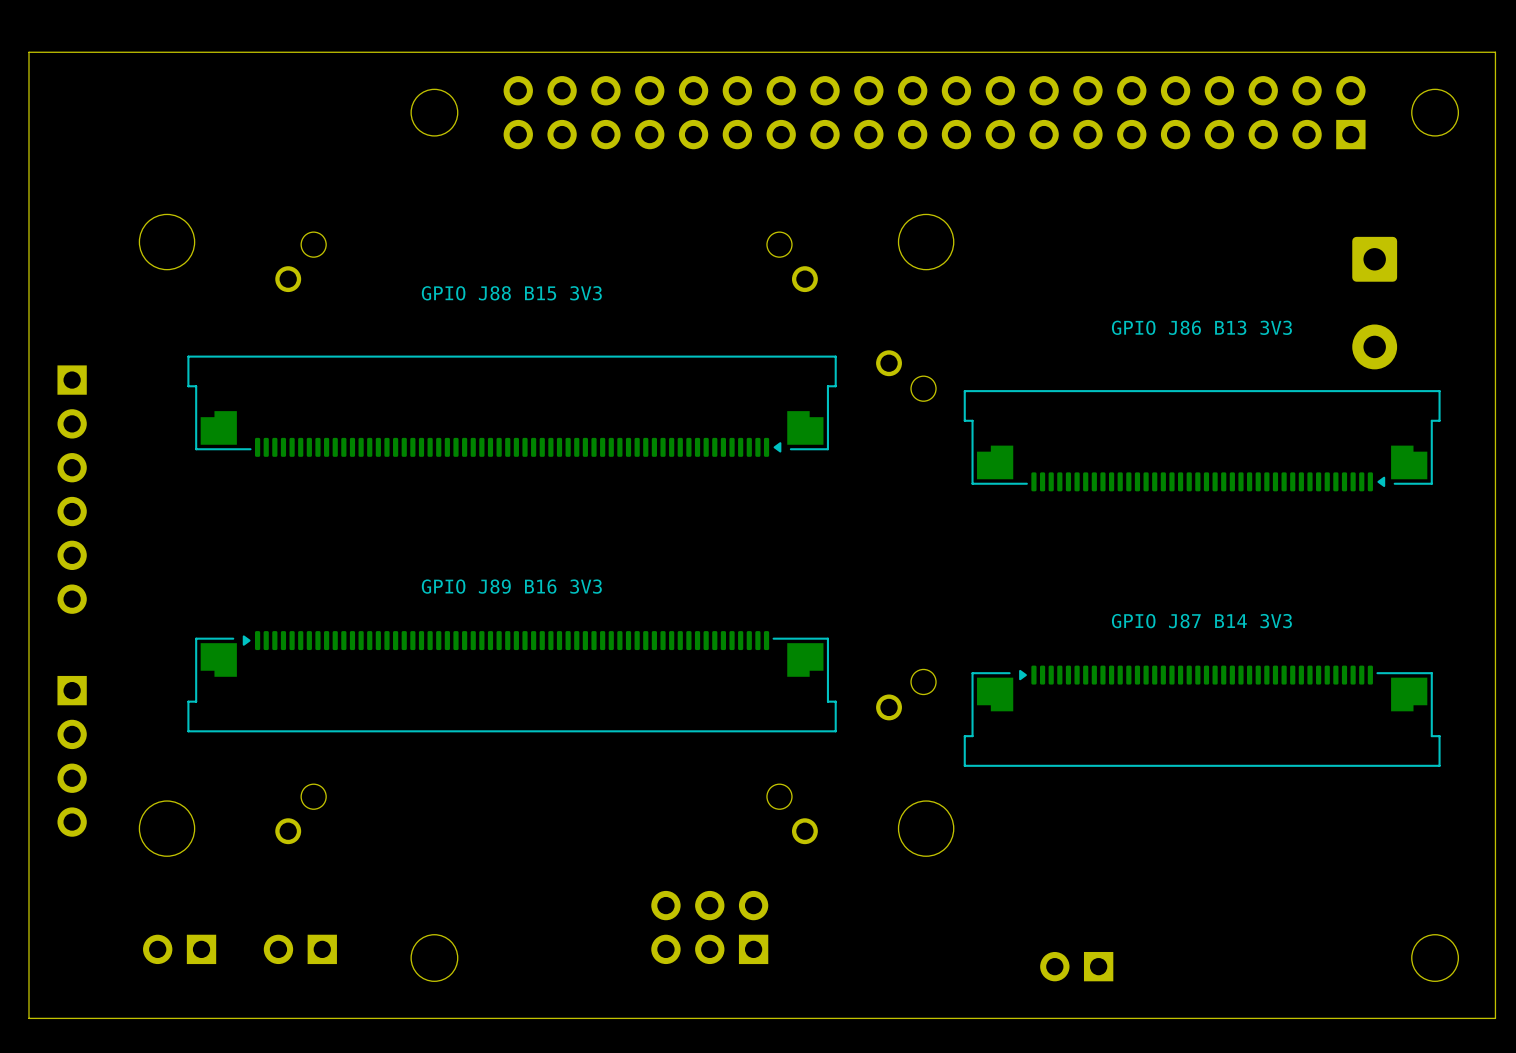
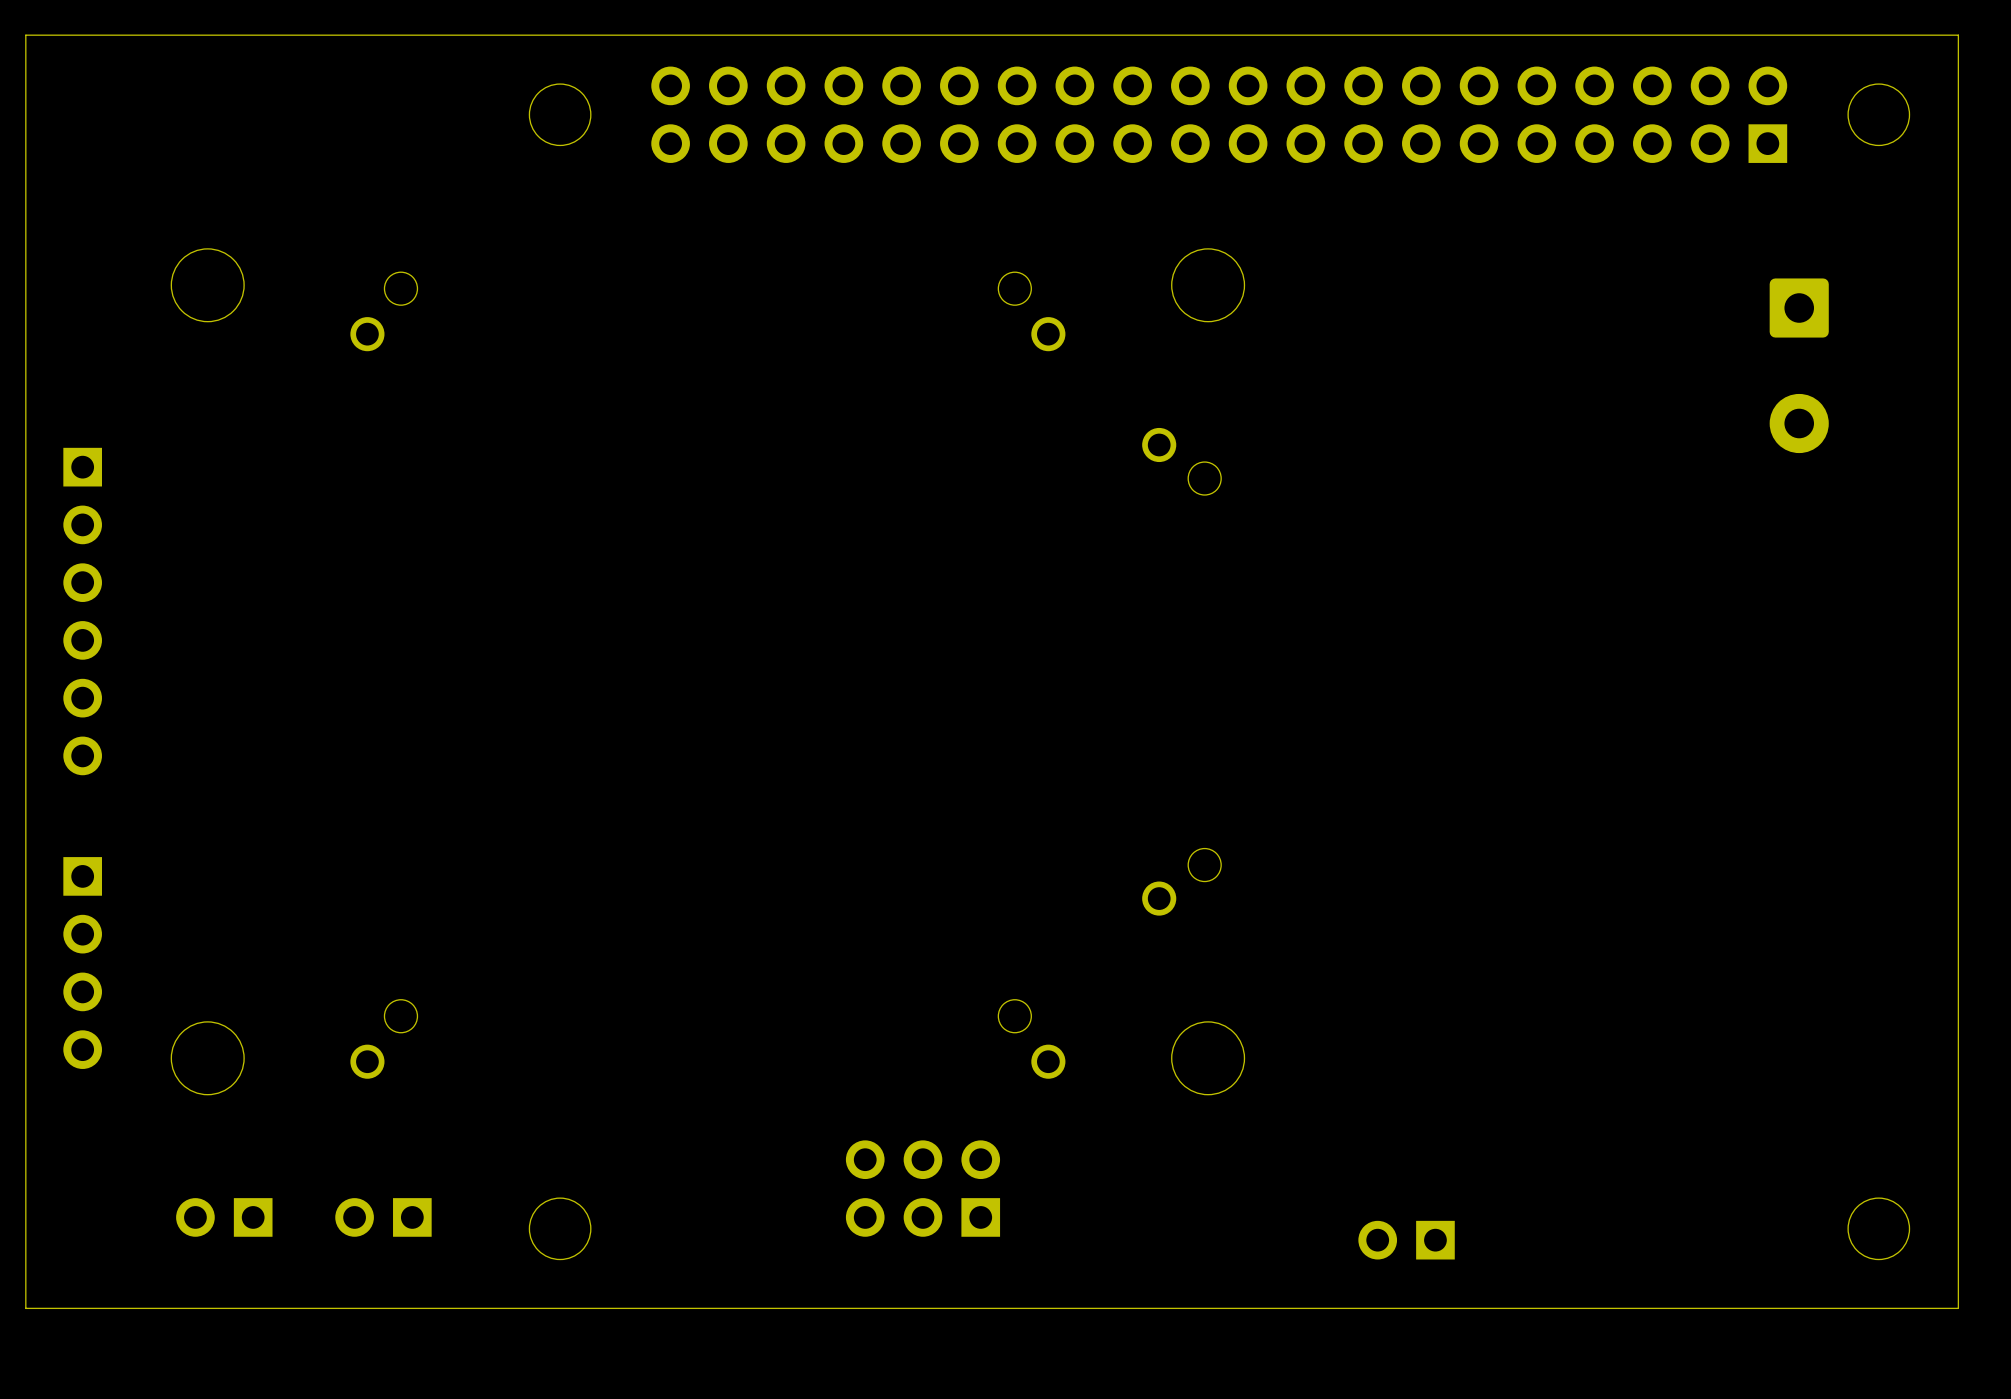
text: GPIO J88 B15 3V3 (511, 293) -> none
text: GPIO J86 B13 3V3 (1201, 327) -> none
part: (512, 406) -> none
part: (1202, 440) -> none
text: GPIO J89 B16 3V3 (511, 586) -> none
text: GPIO J87 B14 3V3 (1201, 621) -> none
part: (512, 681) -> none
part: (1202, 716) -> none

